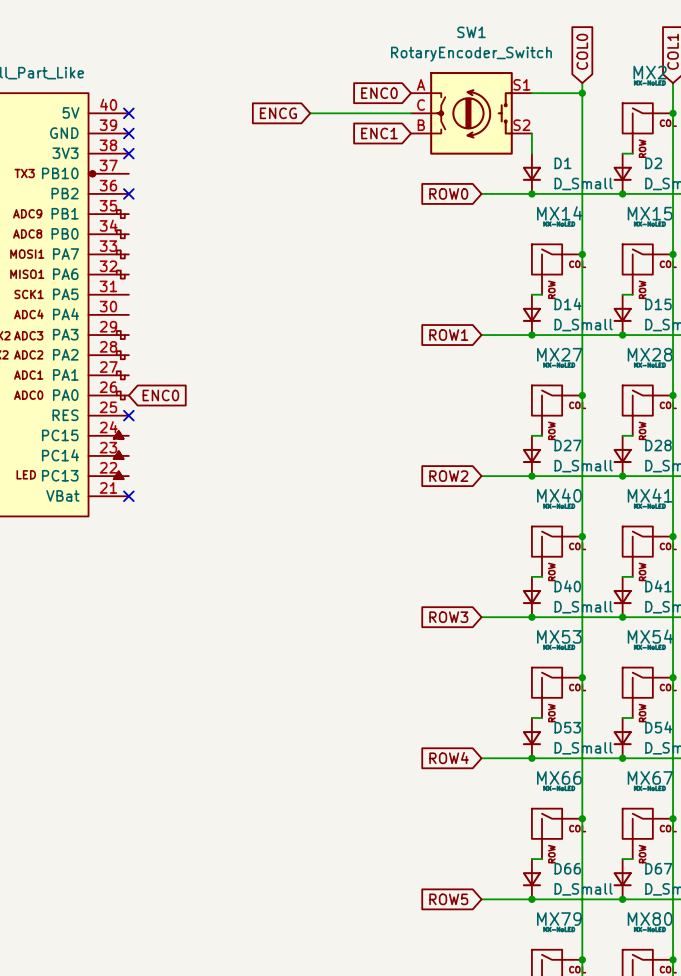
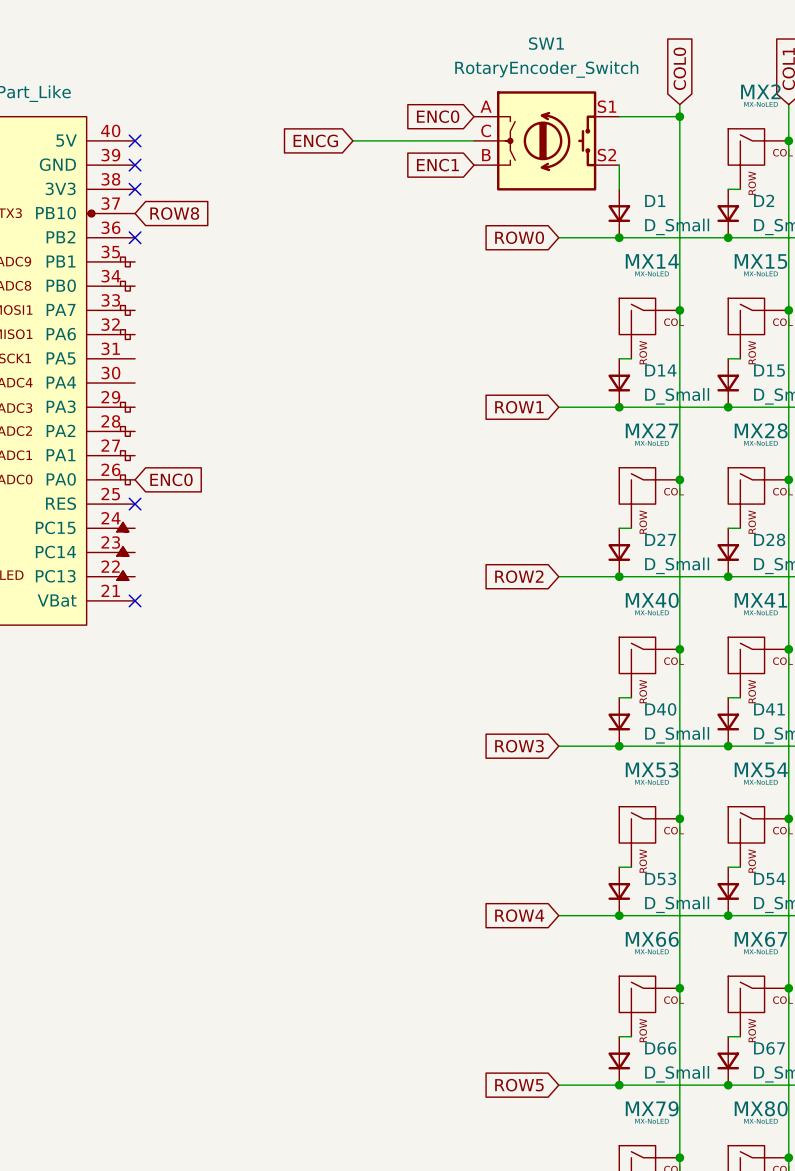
global label: none -> ROW8 (174, 213)

